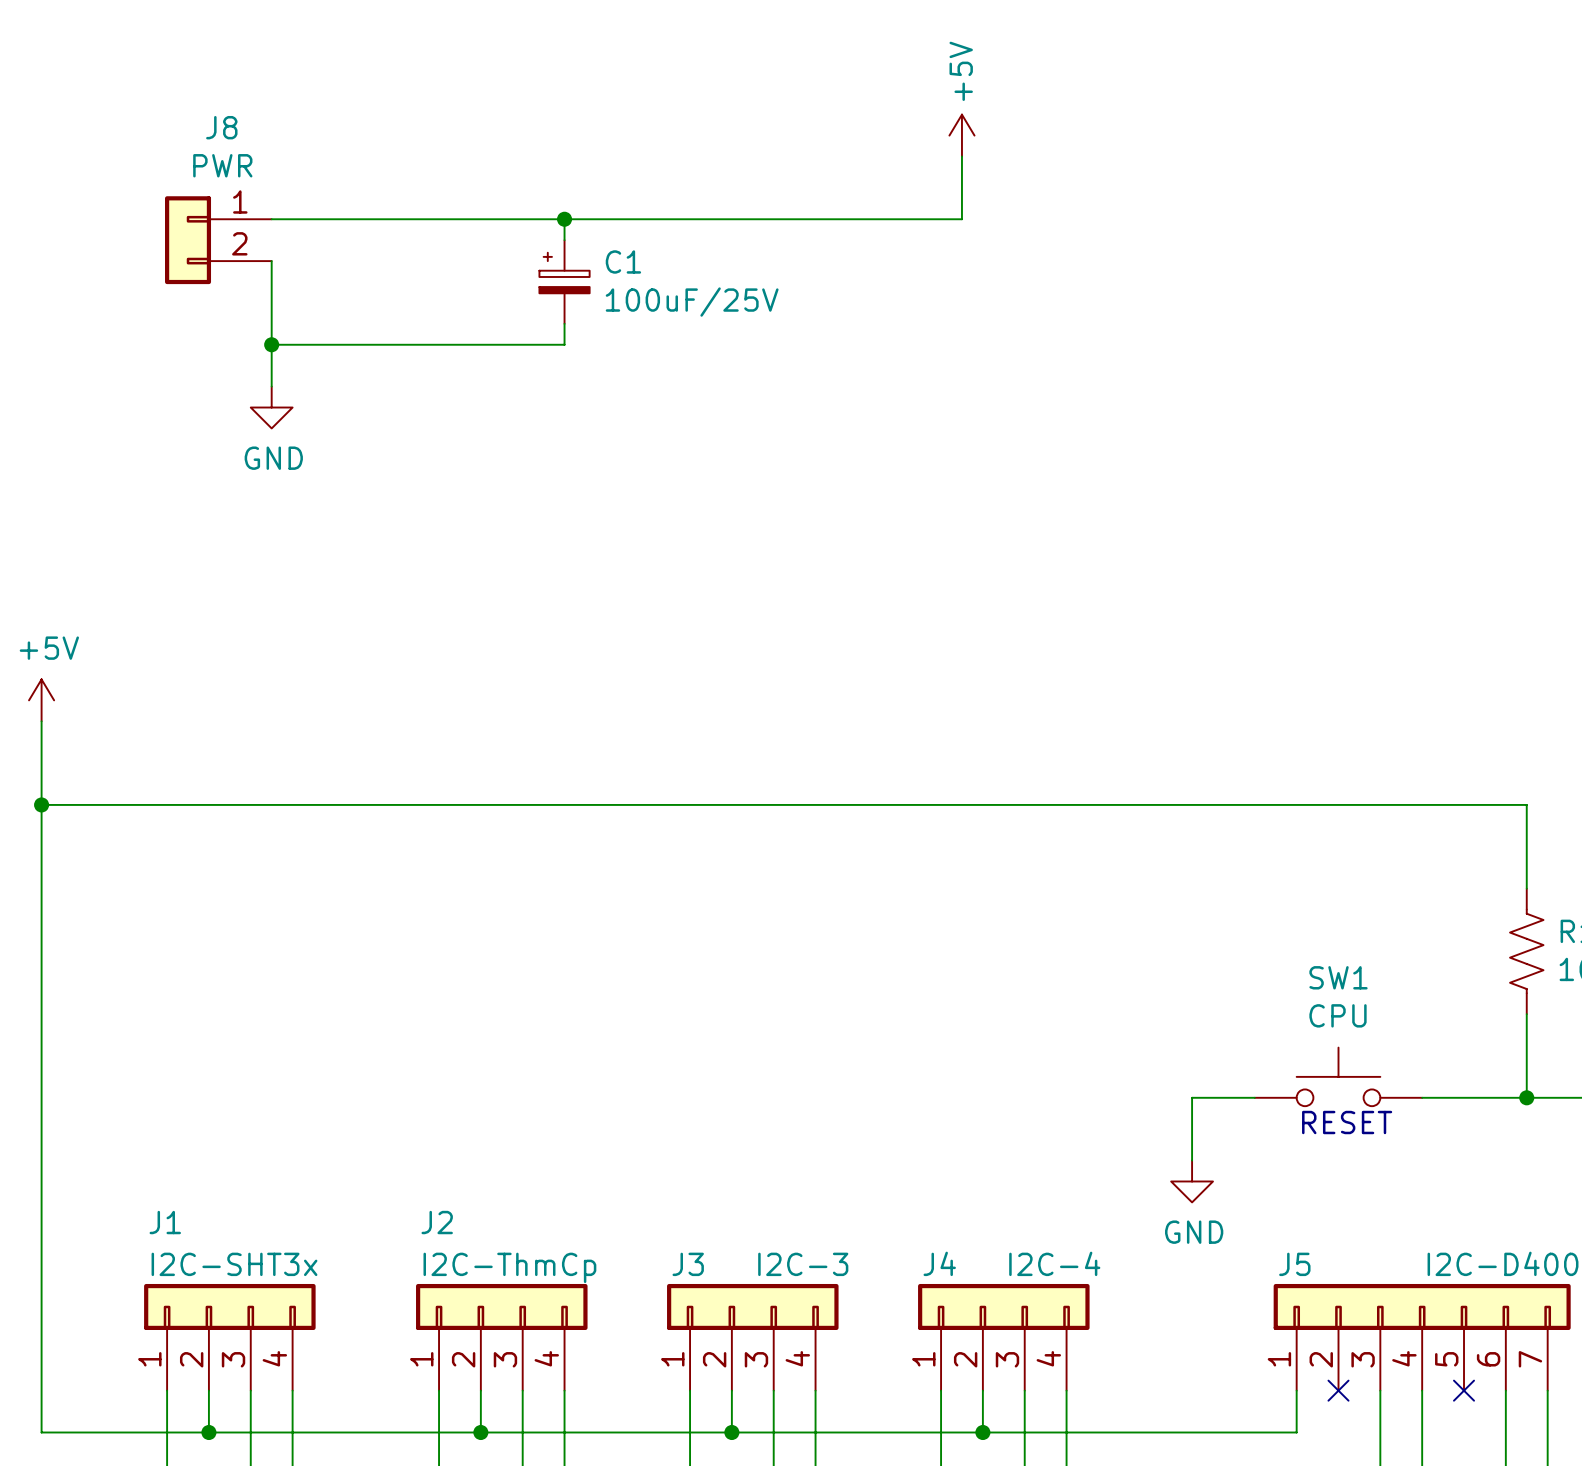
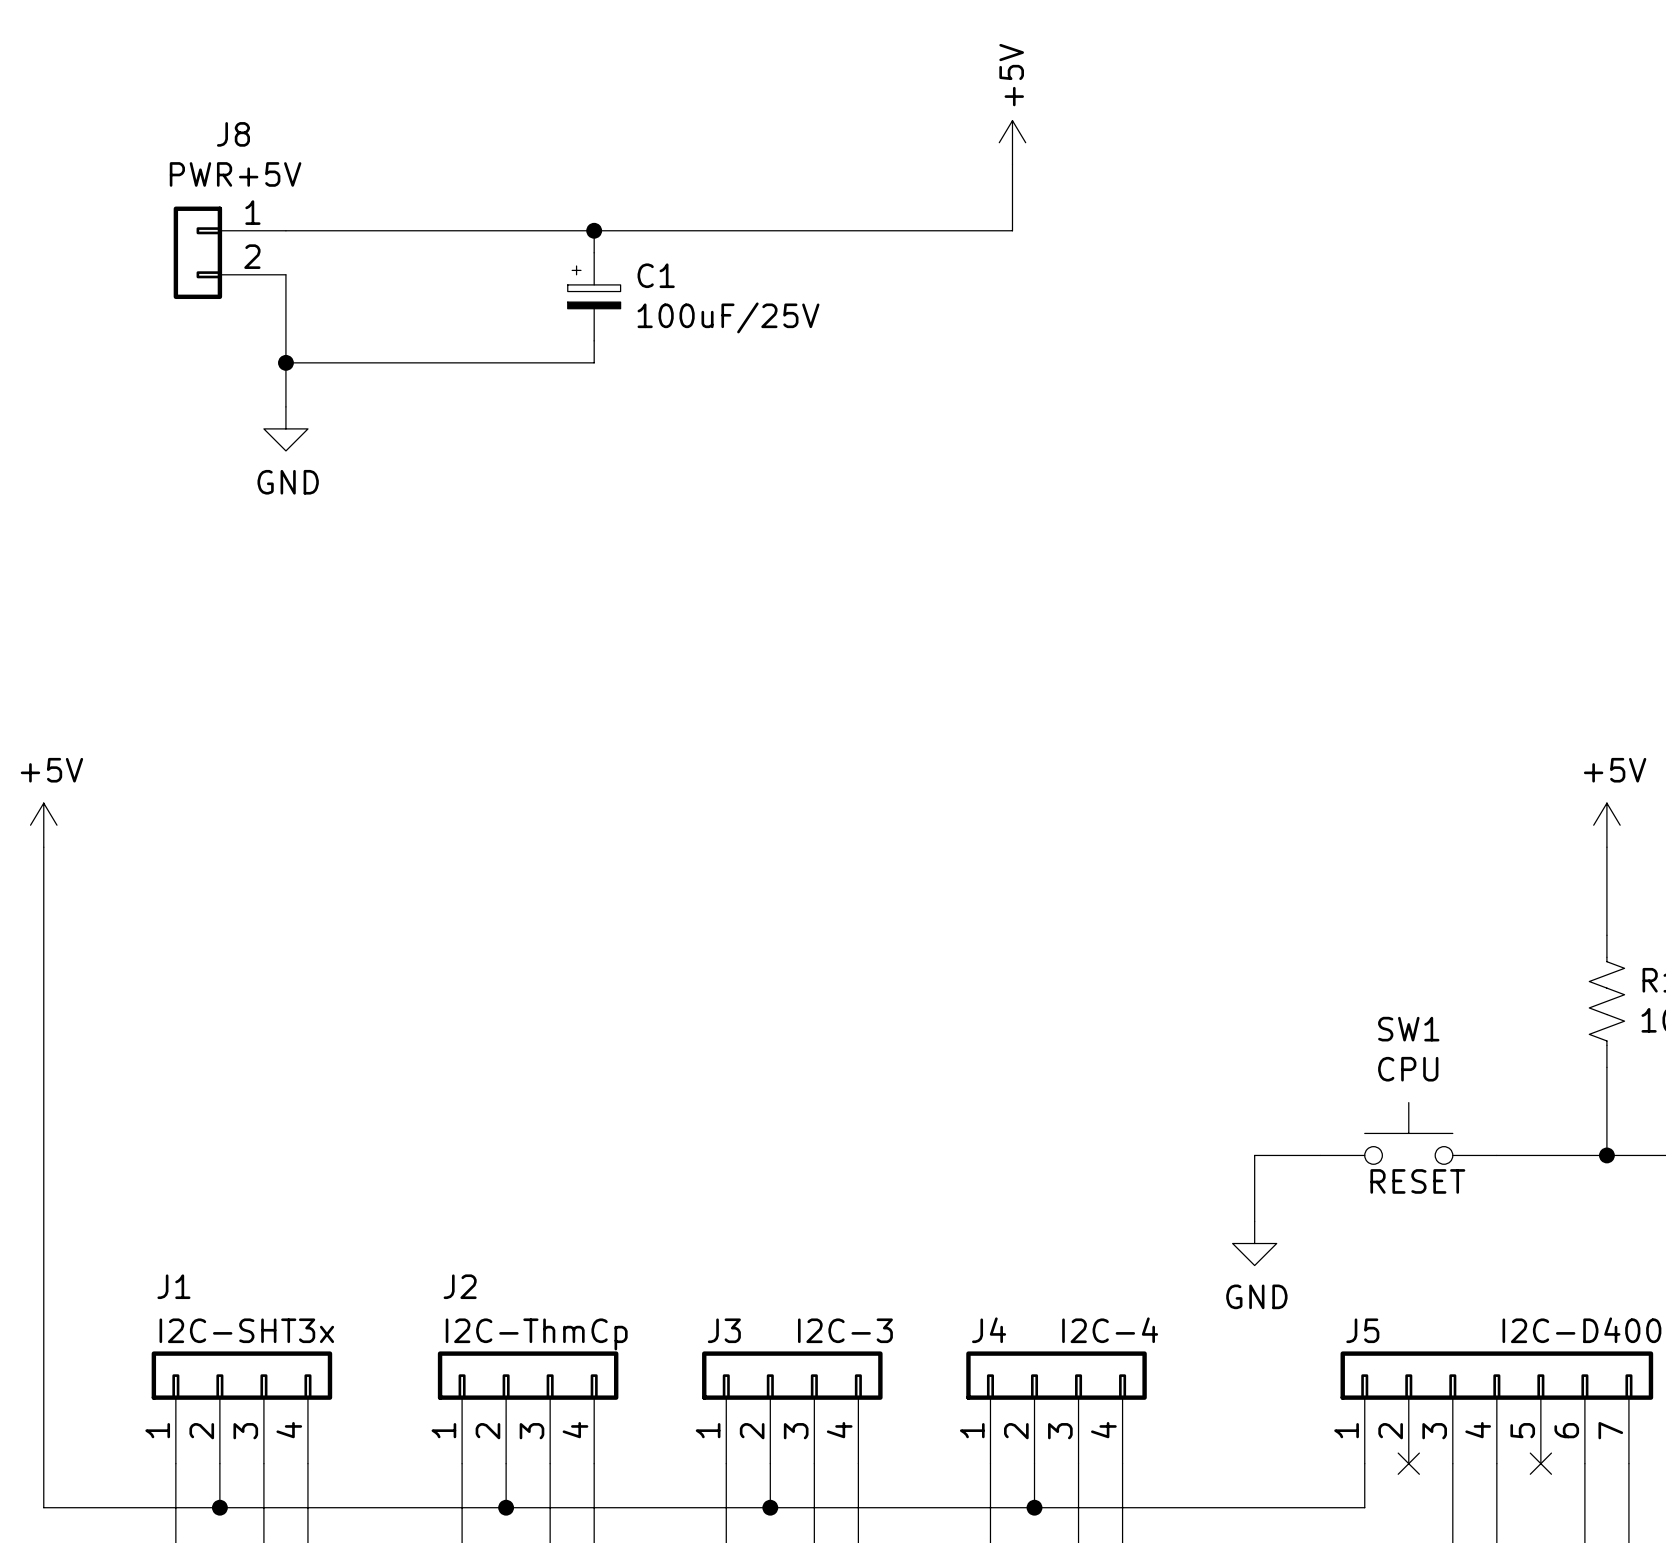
J8 value: PWR (222, 165) -> PWR+5V (235, 174)
power symbol position: +5V (41, 700) -> +5V (43, 825)
wire: (41, 721) (41, 804) (1526, 804) -> none
power symbol: none -> +5V (1606, 825)
junction: (41, 804) -> none

